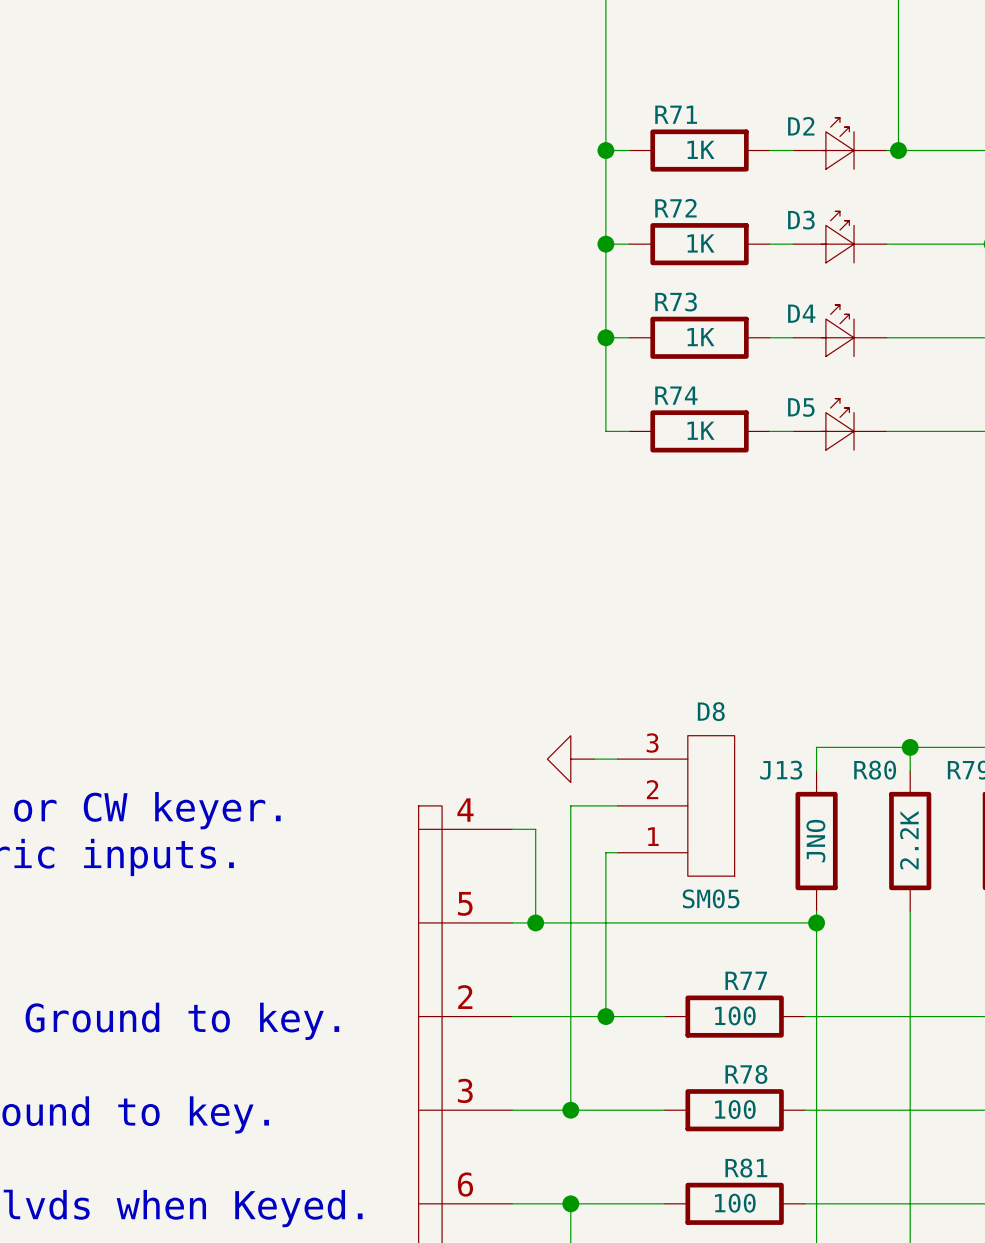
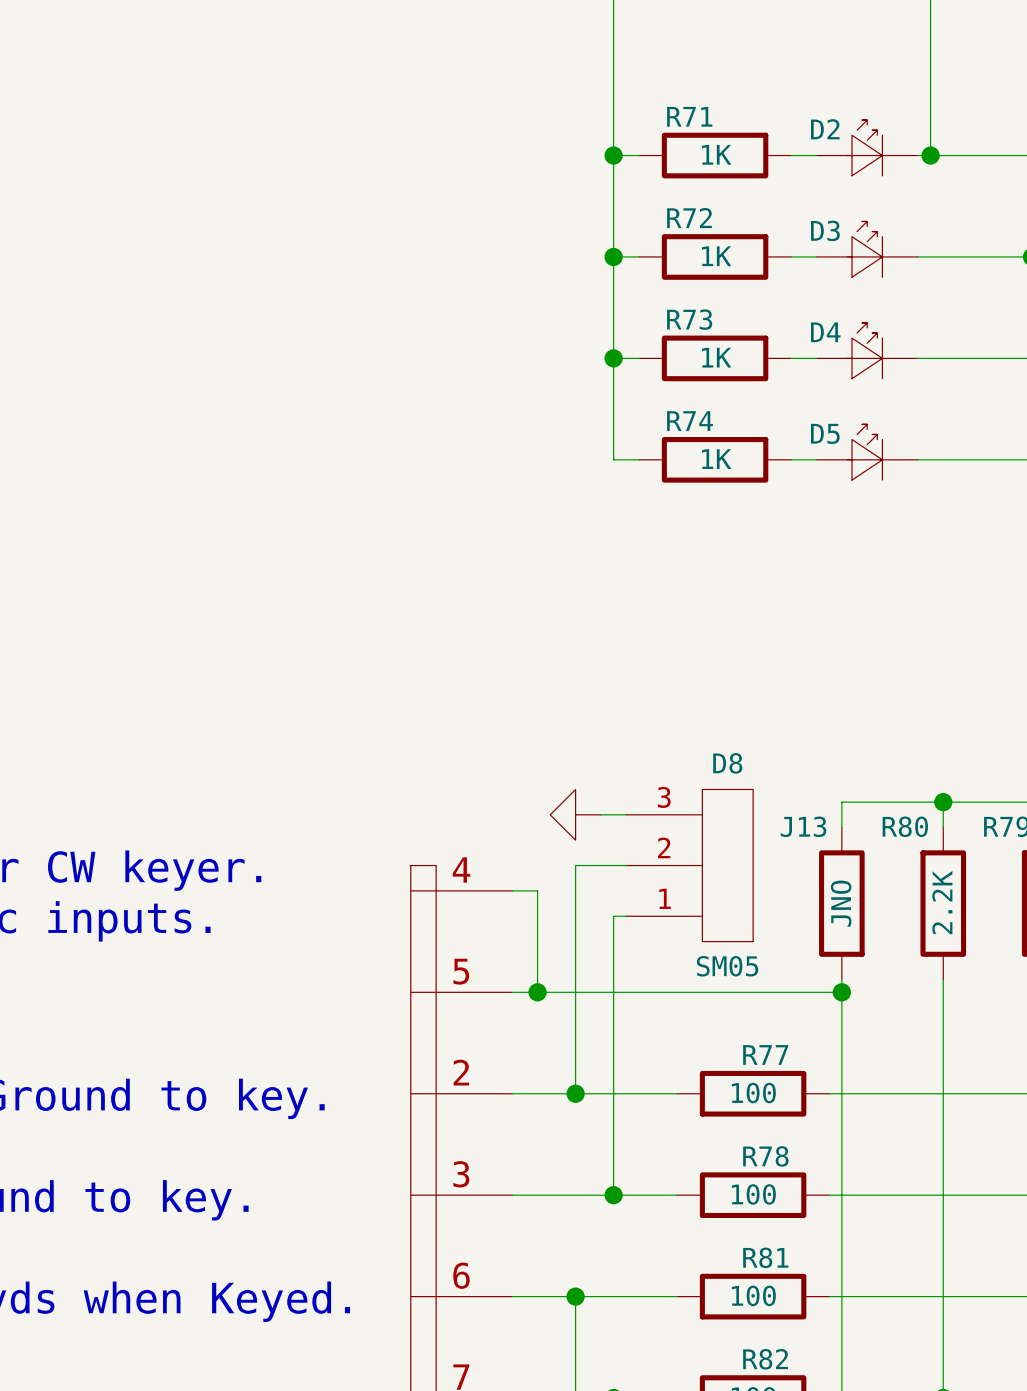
wire: (570, 1016) (570, 1110) -> (613, 1093) (613, 1195)
junction position: (605, 1016) -> (575, 1093)
junction position: (570, 1110) -> (613, 1195)

